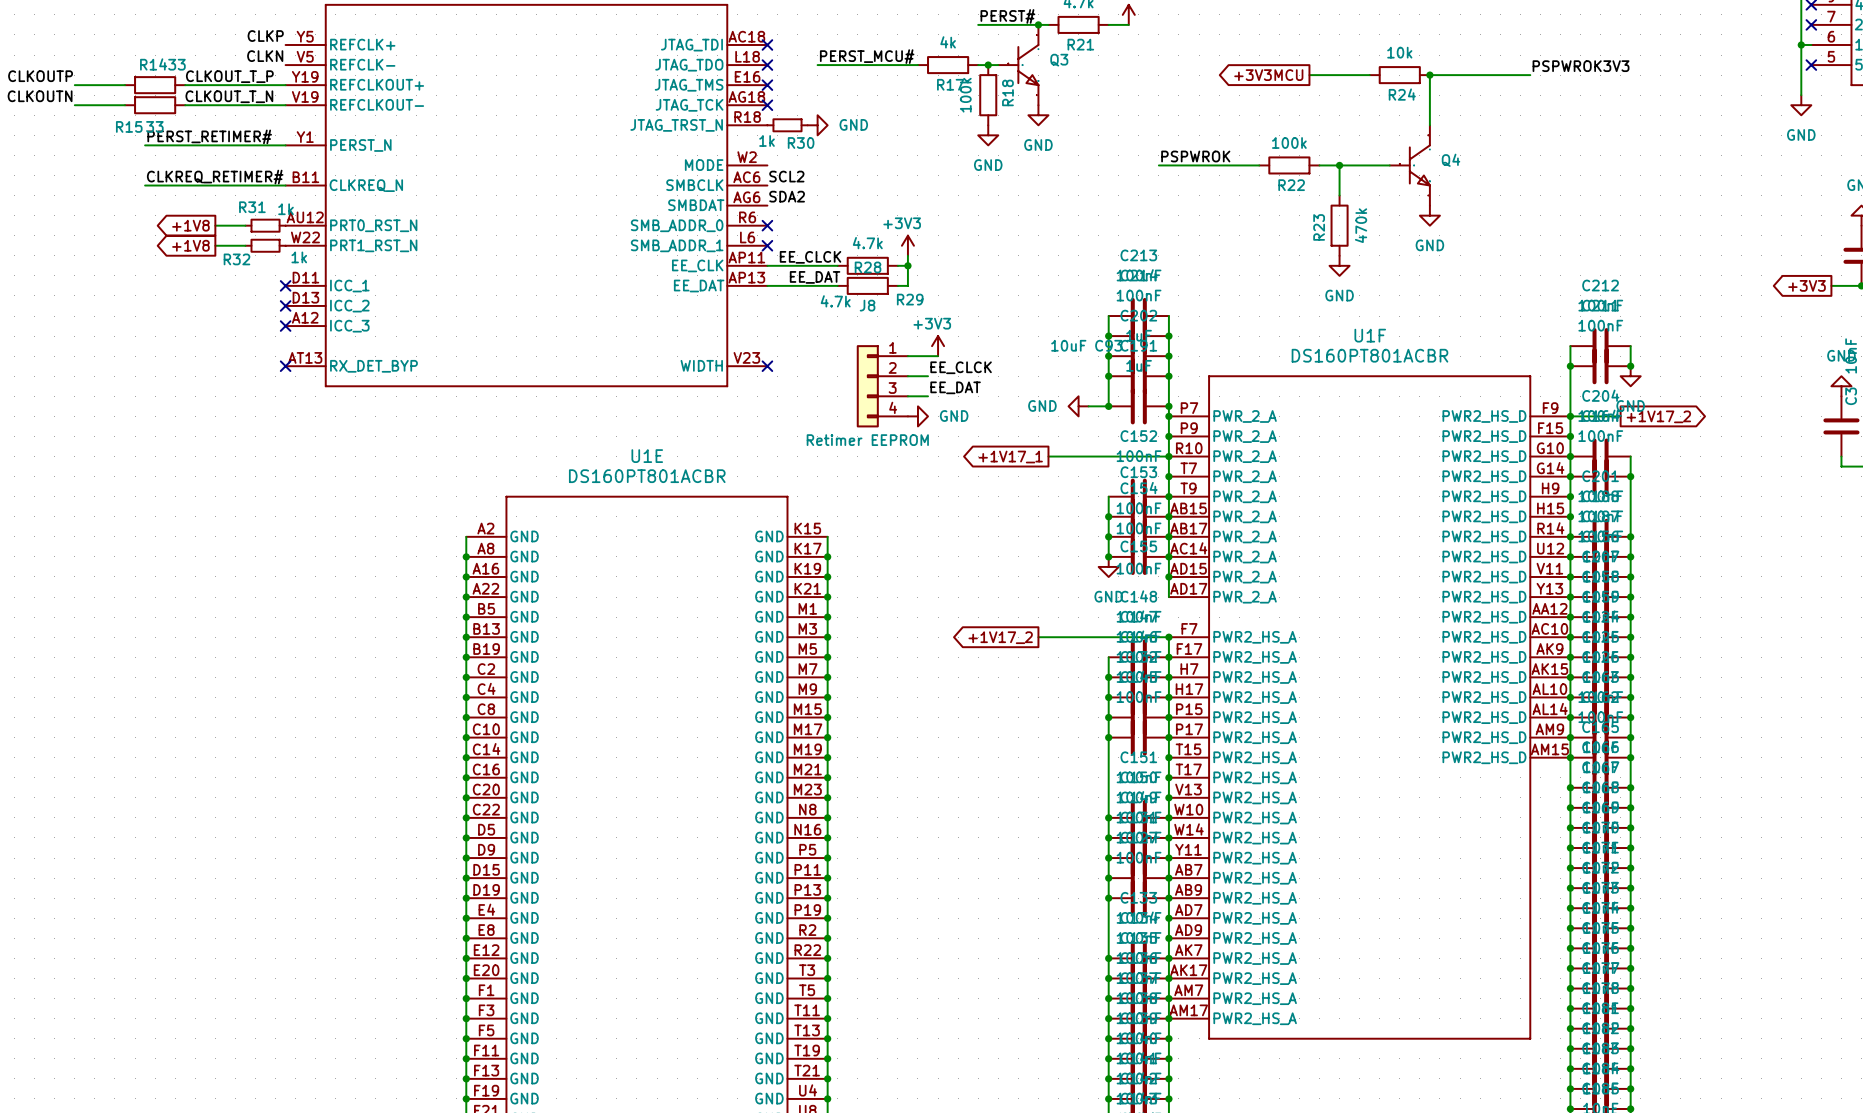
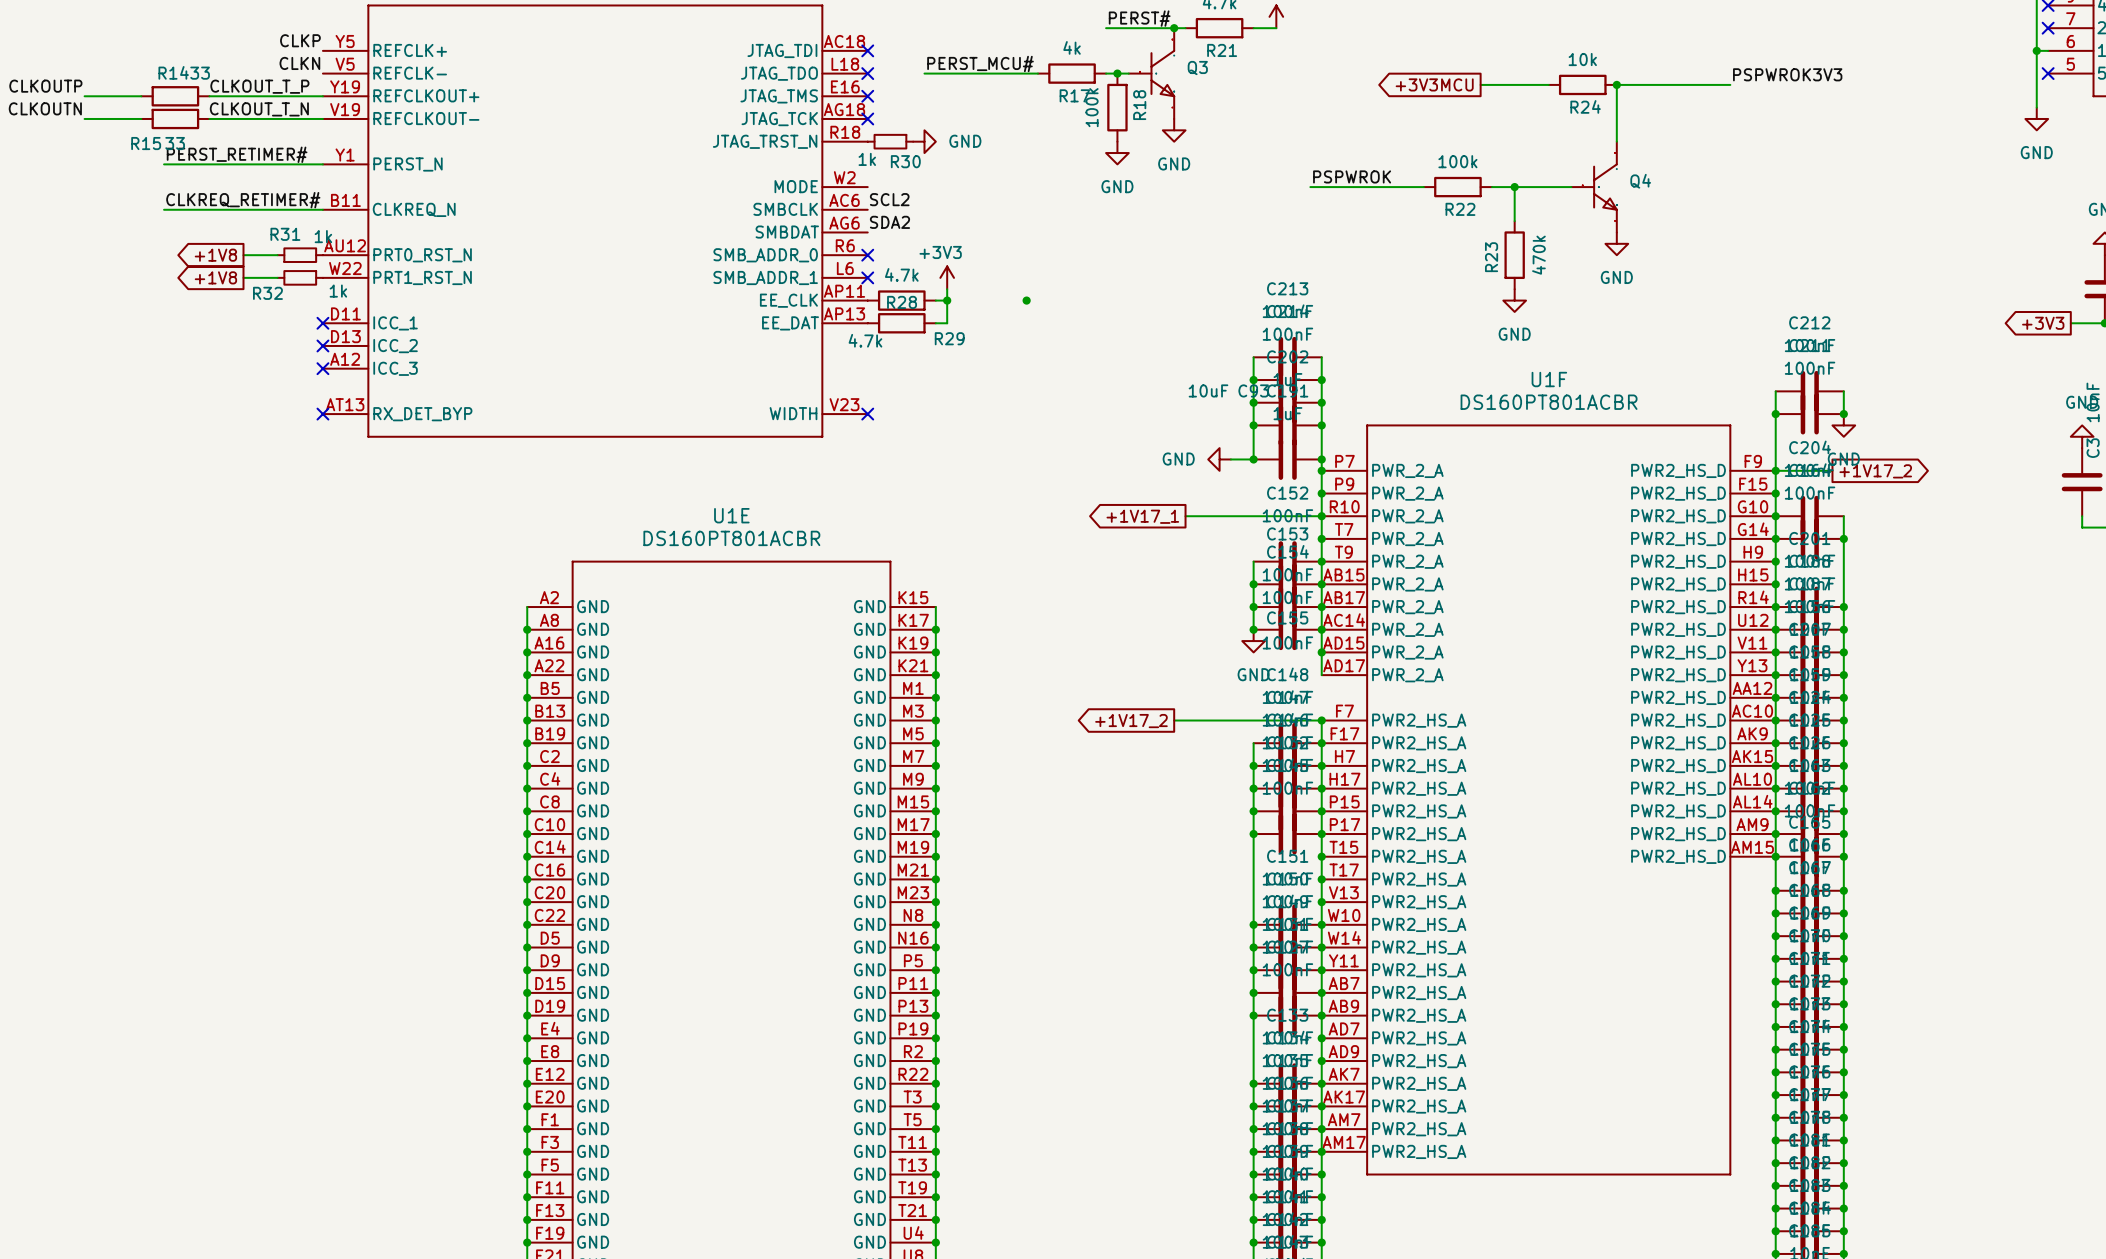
power symbol position: +3V3 (907, 245) -> +3V3 (947, 277)
wire: none -> (947, 289) (947, 323)
wire: (907, 255) (907, 285) (897, 285) -> none
label: EE_CLCK (810, 257) -> none
junction: none -> (947, 300)
R28 position: (867, 265) -> (901, 300)
wire: (897, 265) (907, 265) -> none
label: EE_DAT (815, 277) -> none
wire: (767, 285) (827, 285) -> none
R29 position: (867, 285) -> (901, 323)
power symbol: +3V3 (938, 346) -> none
wire: (907, 356) (938, 356) -> none
label: EE_CLCK (961, 367) -> none
wire: (907, 376) (928, 376) -> none
J8: Retimer EEPROM (882, 386) -> none
label: EE_DAT (955, 387) -> none
wire: (907, 396) (928, 396) -> none
power symbol: GND (917, 416) -> none

